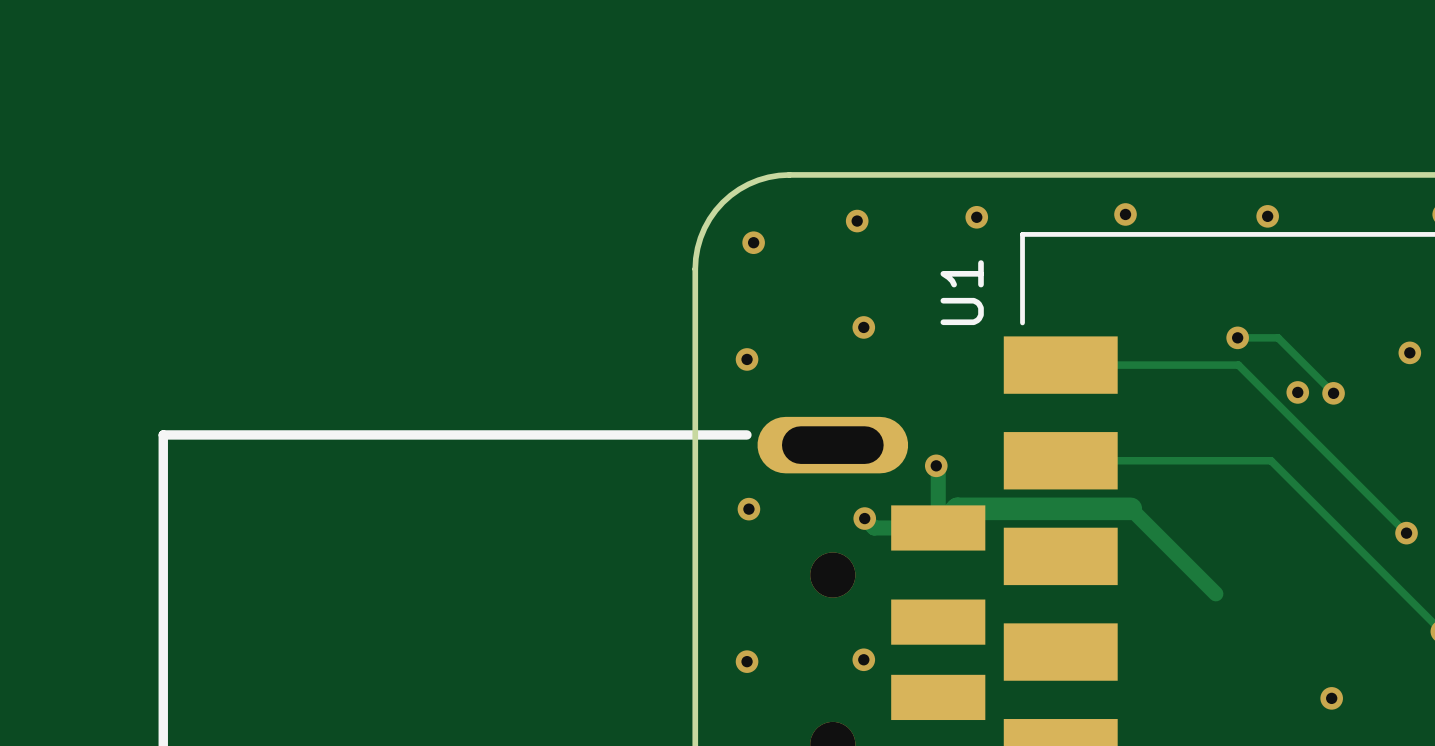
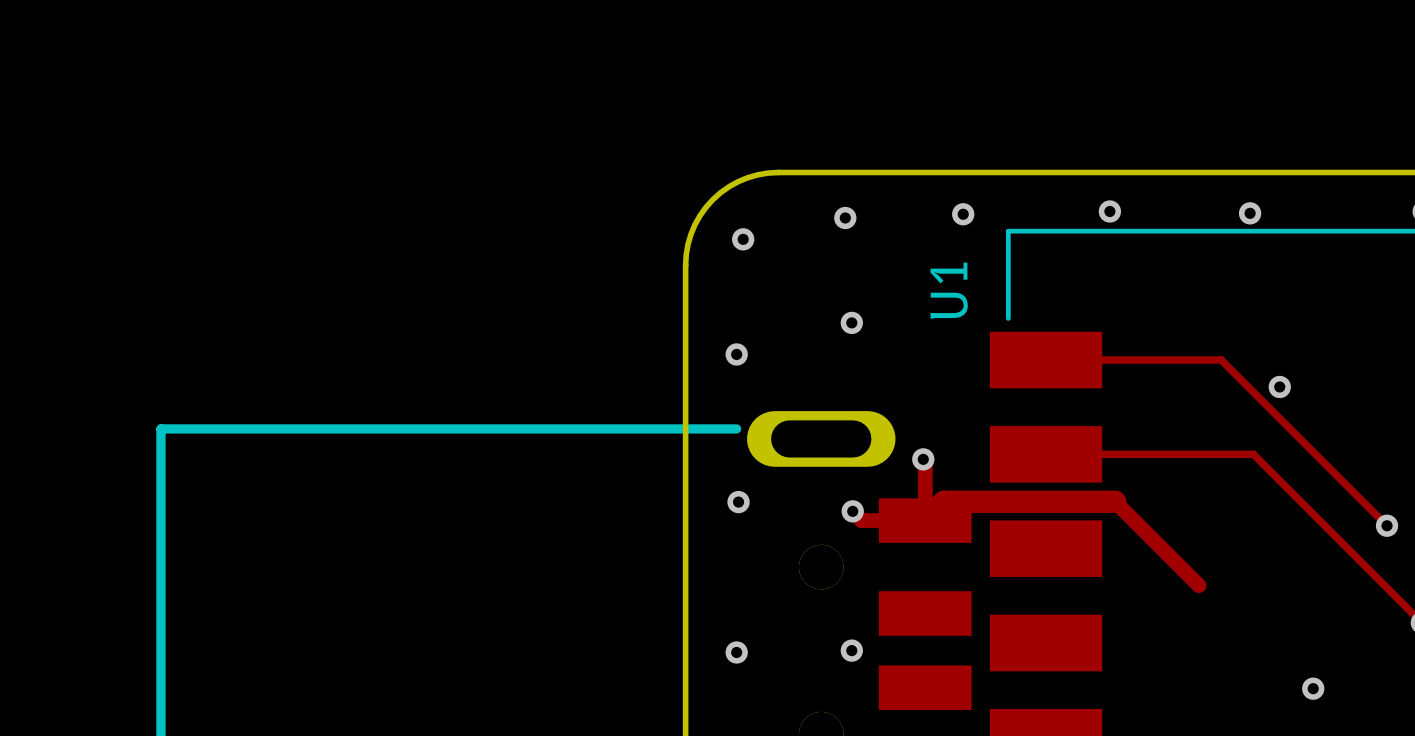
track: (1237, 337) (1278, 337) (1333, 393) -> none
via: (1237, 337) -> none
via: (1409, 352) -> none
via: (1333, 393) -> none

